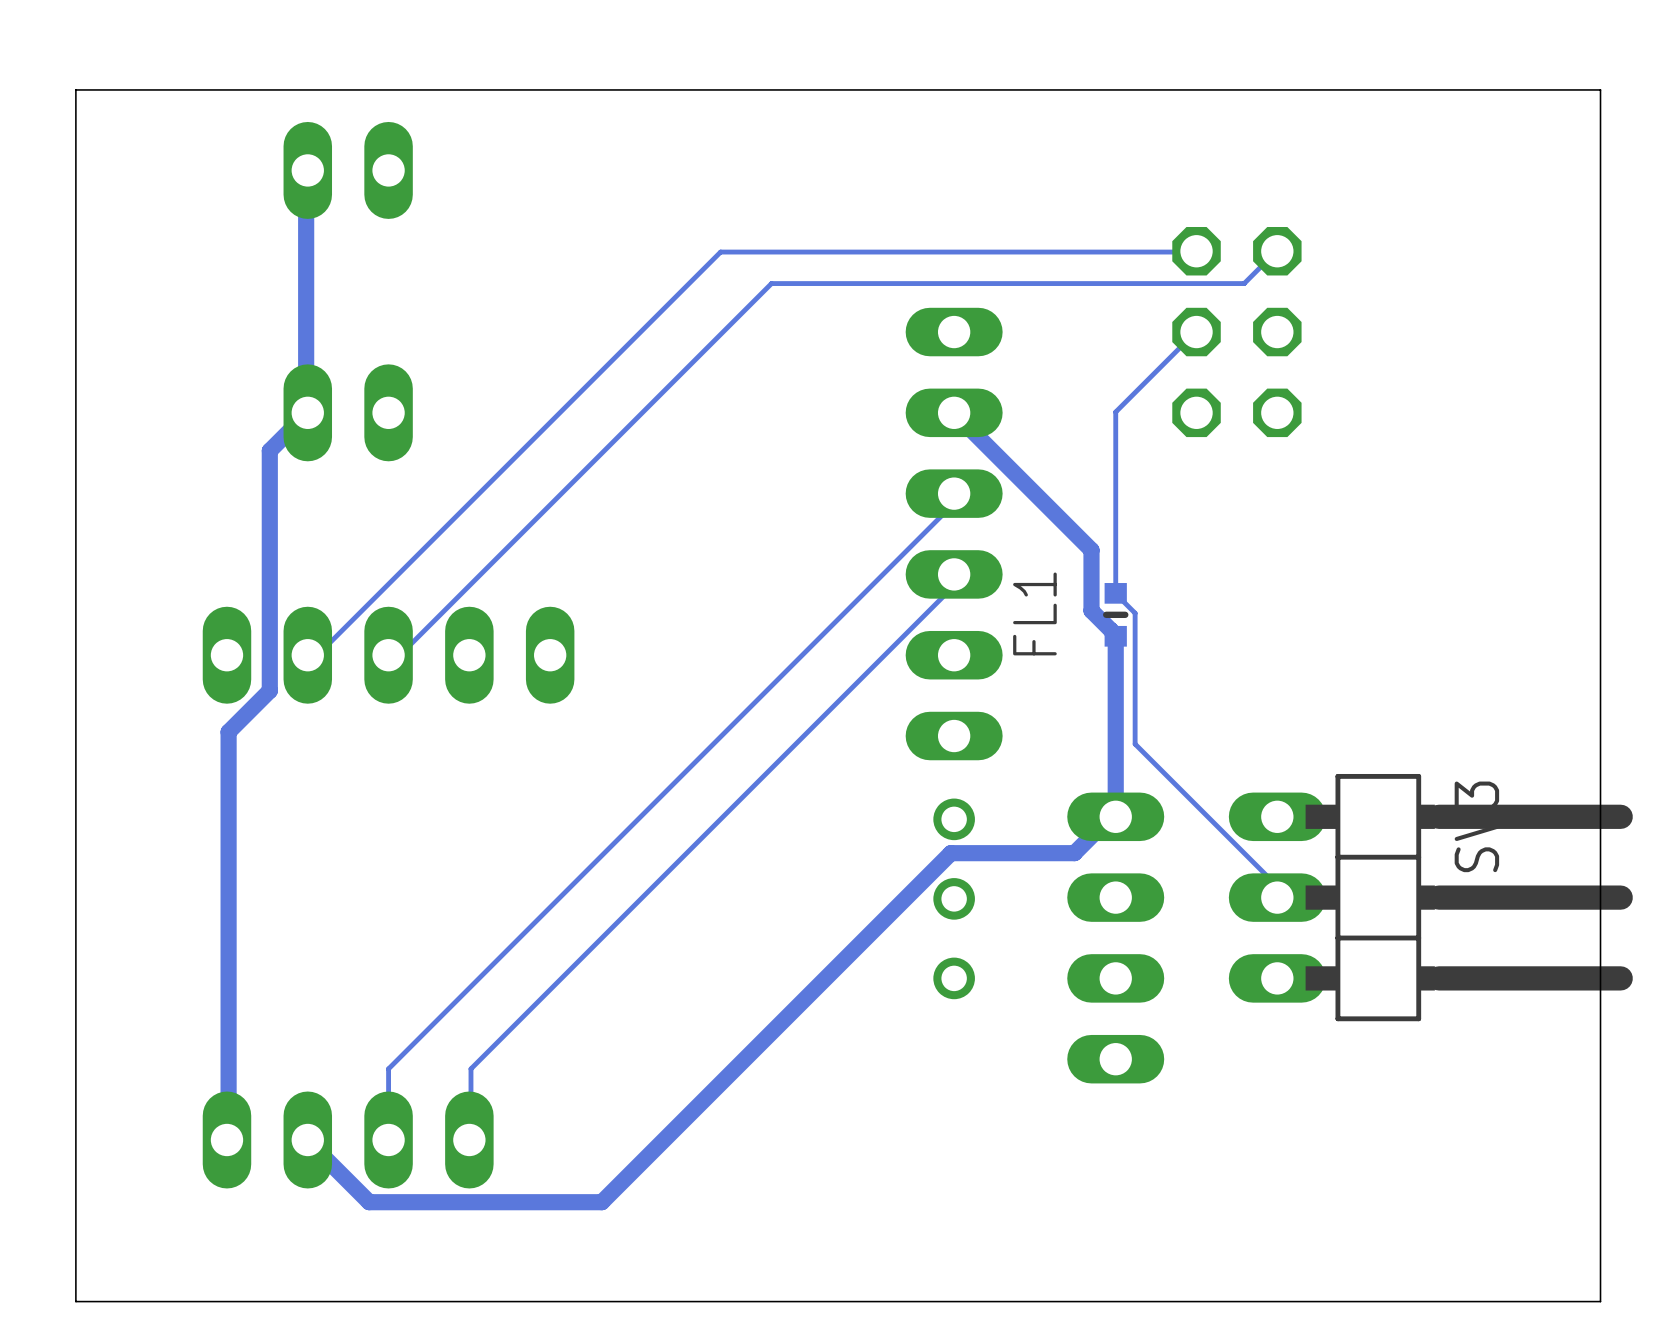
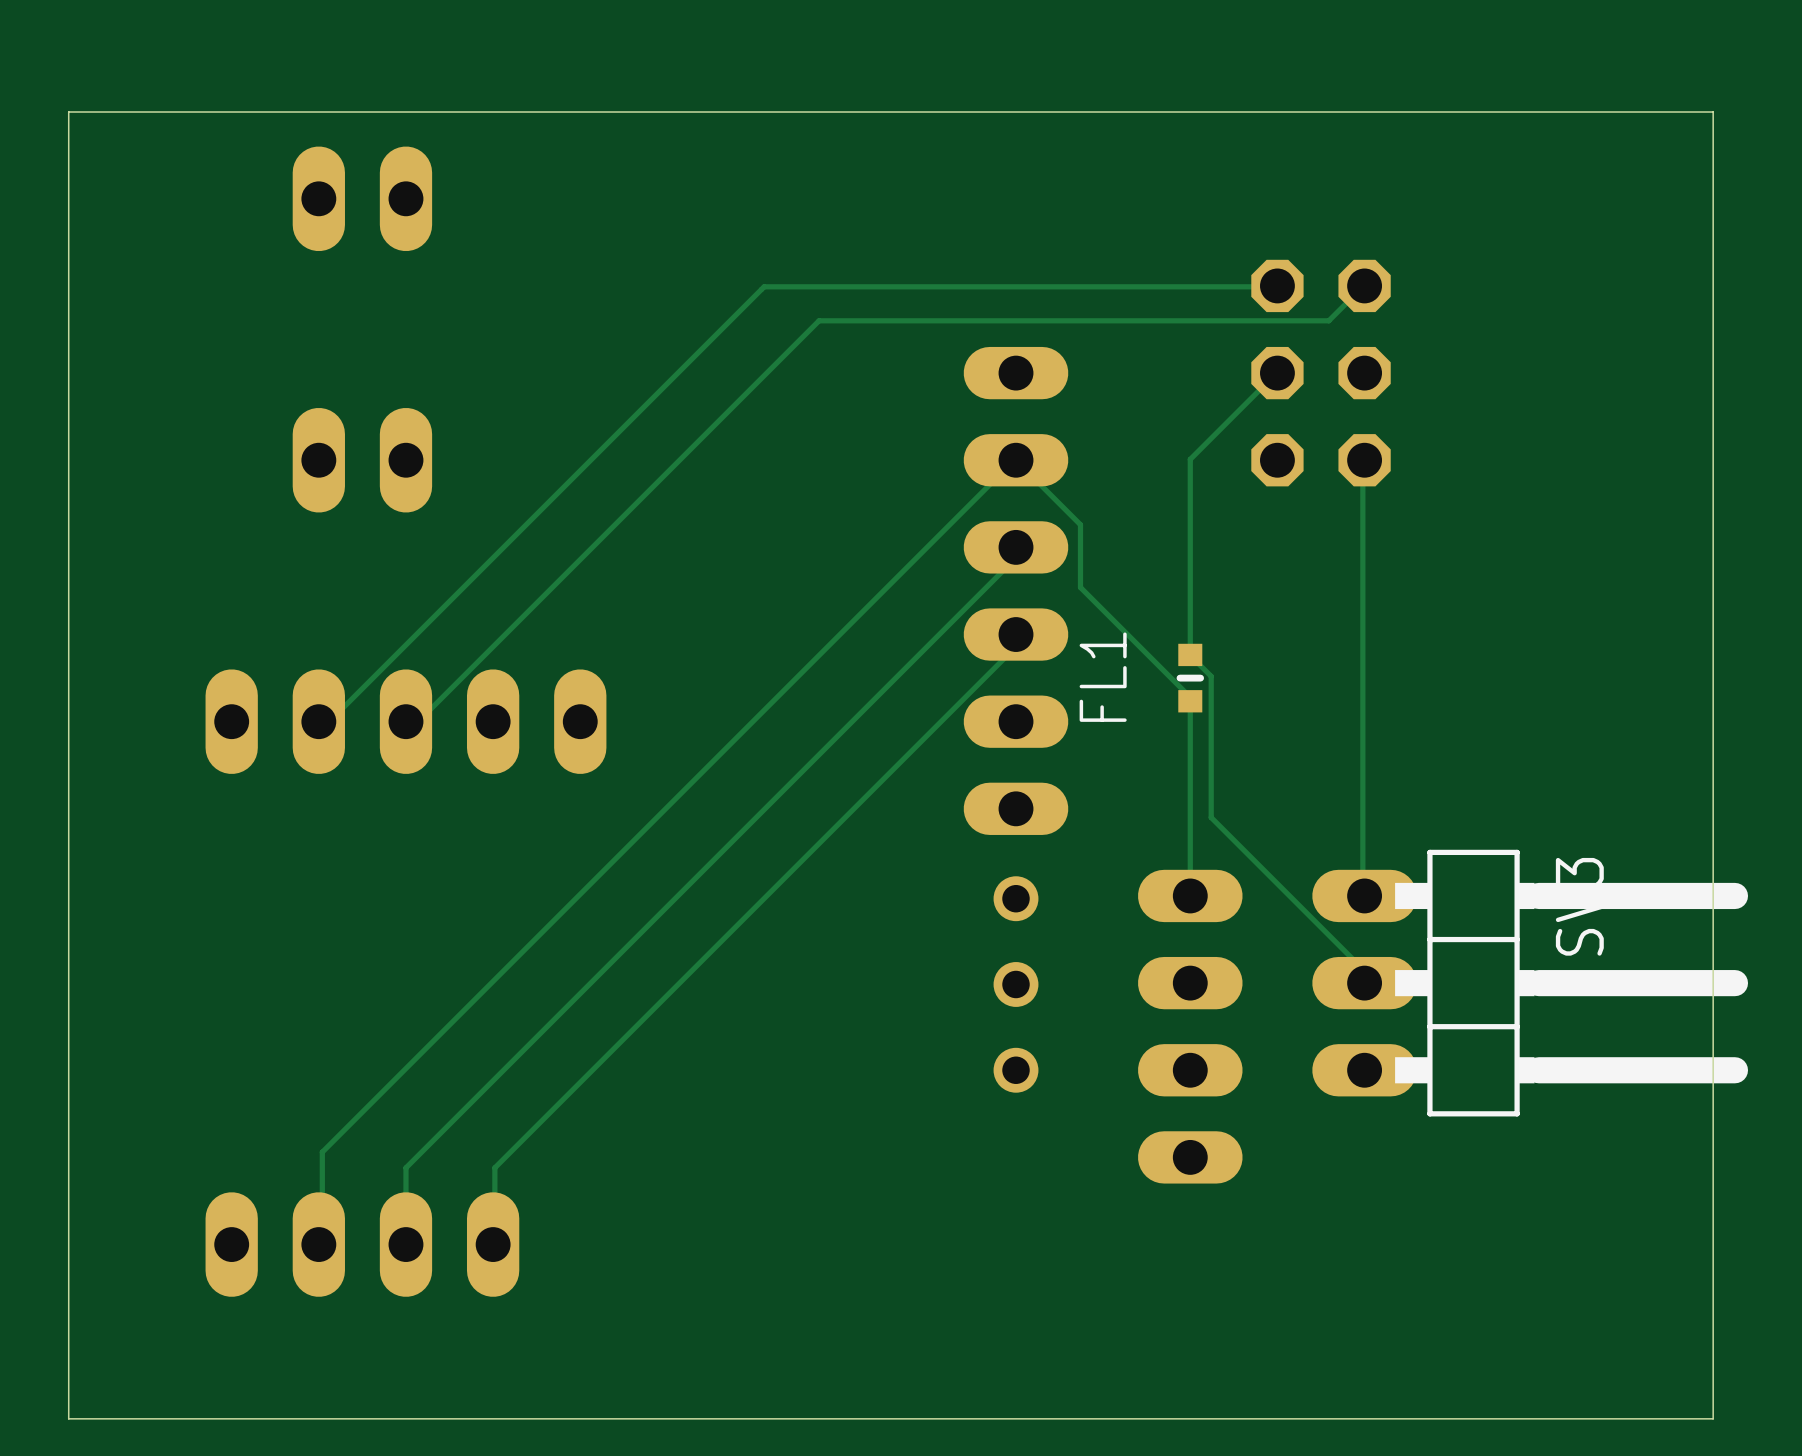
track: (307, 170) (306, 172) (306, 407) (307, 412) (269, 450) (269, 690) (228, 731) (228, 1139) (226, 1139) -> none
track width: thick (954, 412) (1013, 472) -> thin (1016, 460) (1080, 524)
track: none -> (1364, 460) (1362, 461) (1362, 895) (1364, 895)
track: (1013, 472) (1091, 550) (1091, 610) (1115, 636) -> (1080, 524) (1080, 587) (1190, 697) (1190, 701)
track width: thick (1115, 636) (1115, 816) -> thin (1190, 701) (1190, 895)
track: (1115, 816) (1108, 819) (1074, 853) (950, 853) (601, 1202) (369, 1202) (307, 1139) -> (1016, 460) (322, 1152) (322, 1241) (318, 1244)

